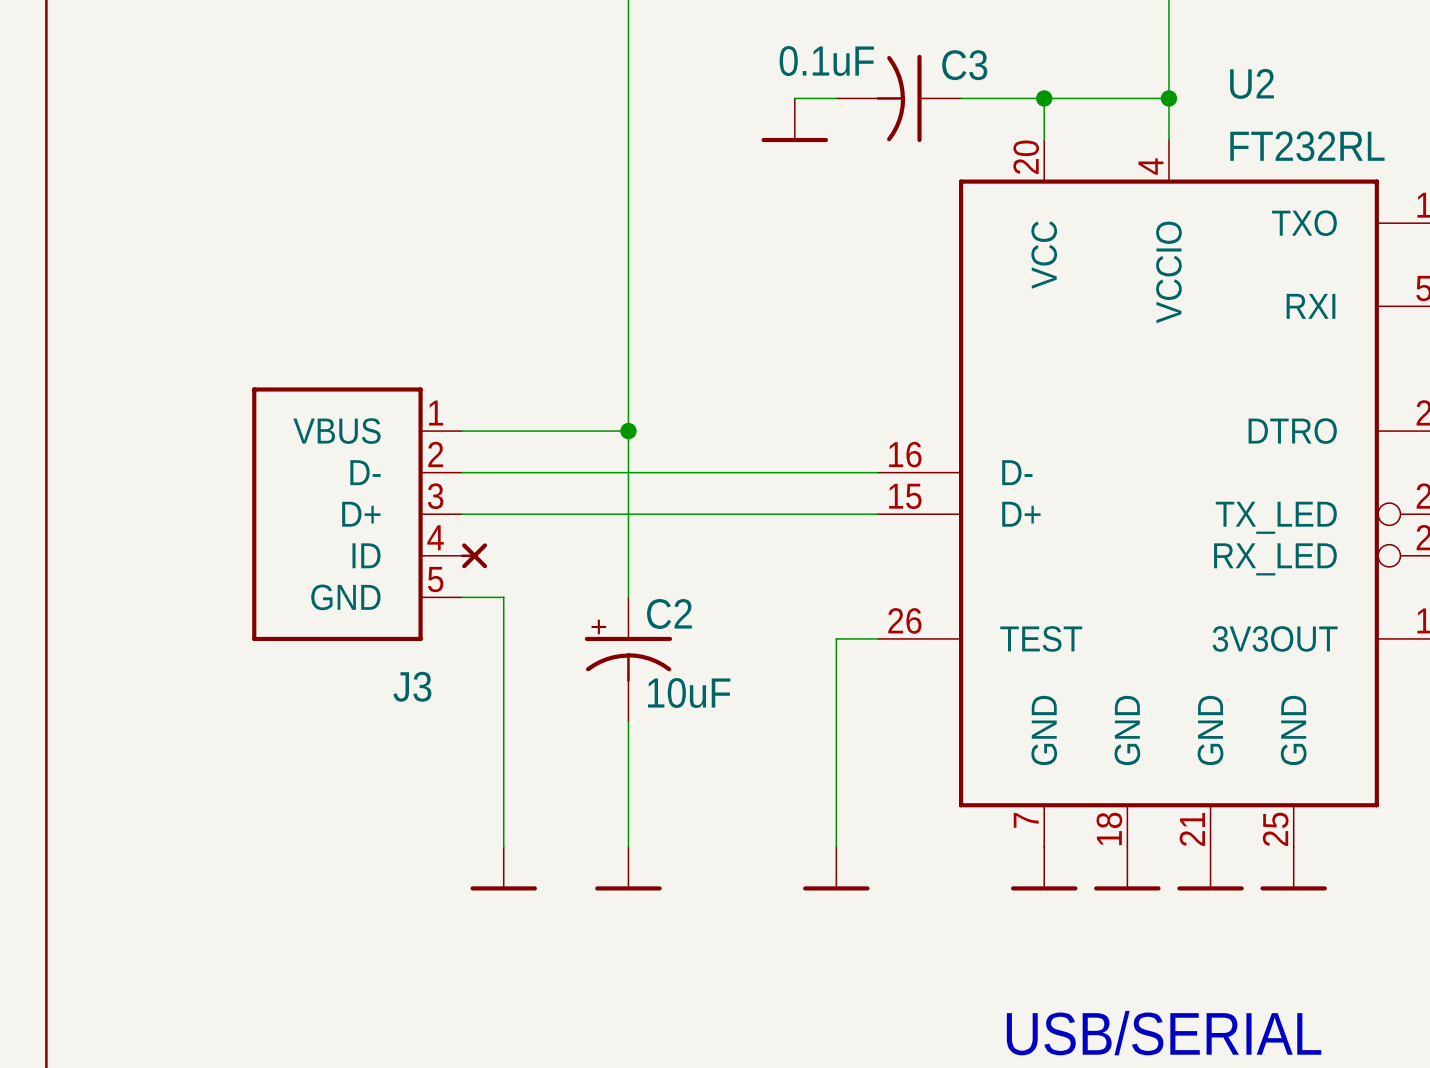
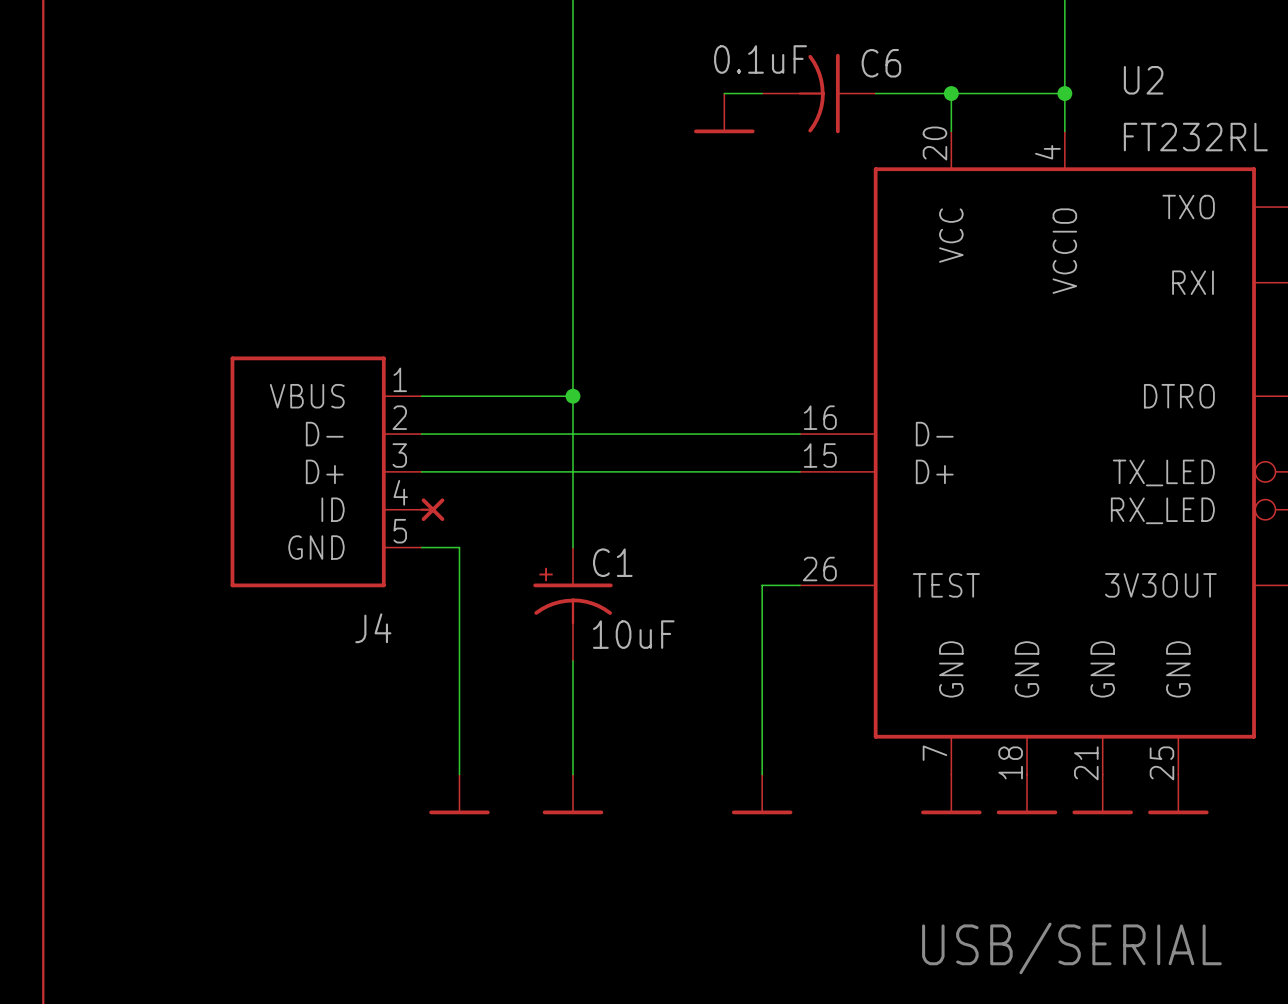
C3 name: C3 (964, 65) -> C6 (881, 63)
C2 name: C2 (669, 613) -> C1 (612, 562)
J3 name: J3 (412, 686) -> J4 (373, 628)

